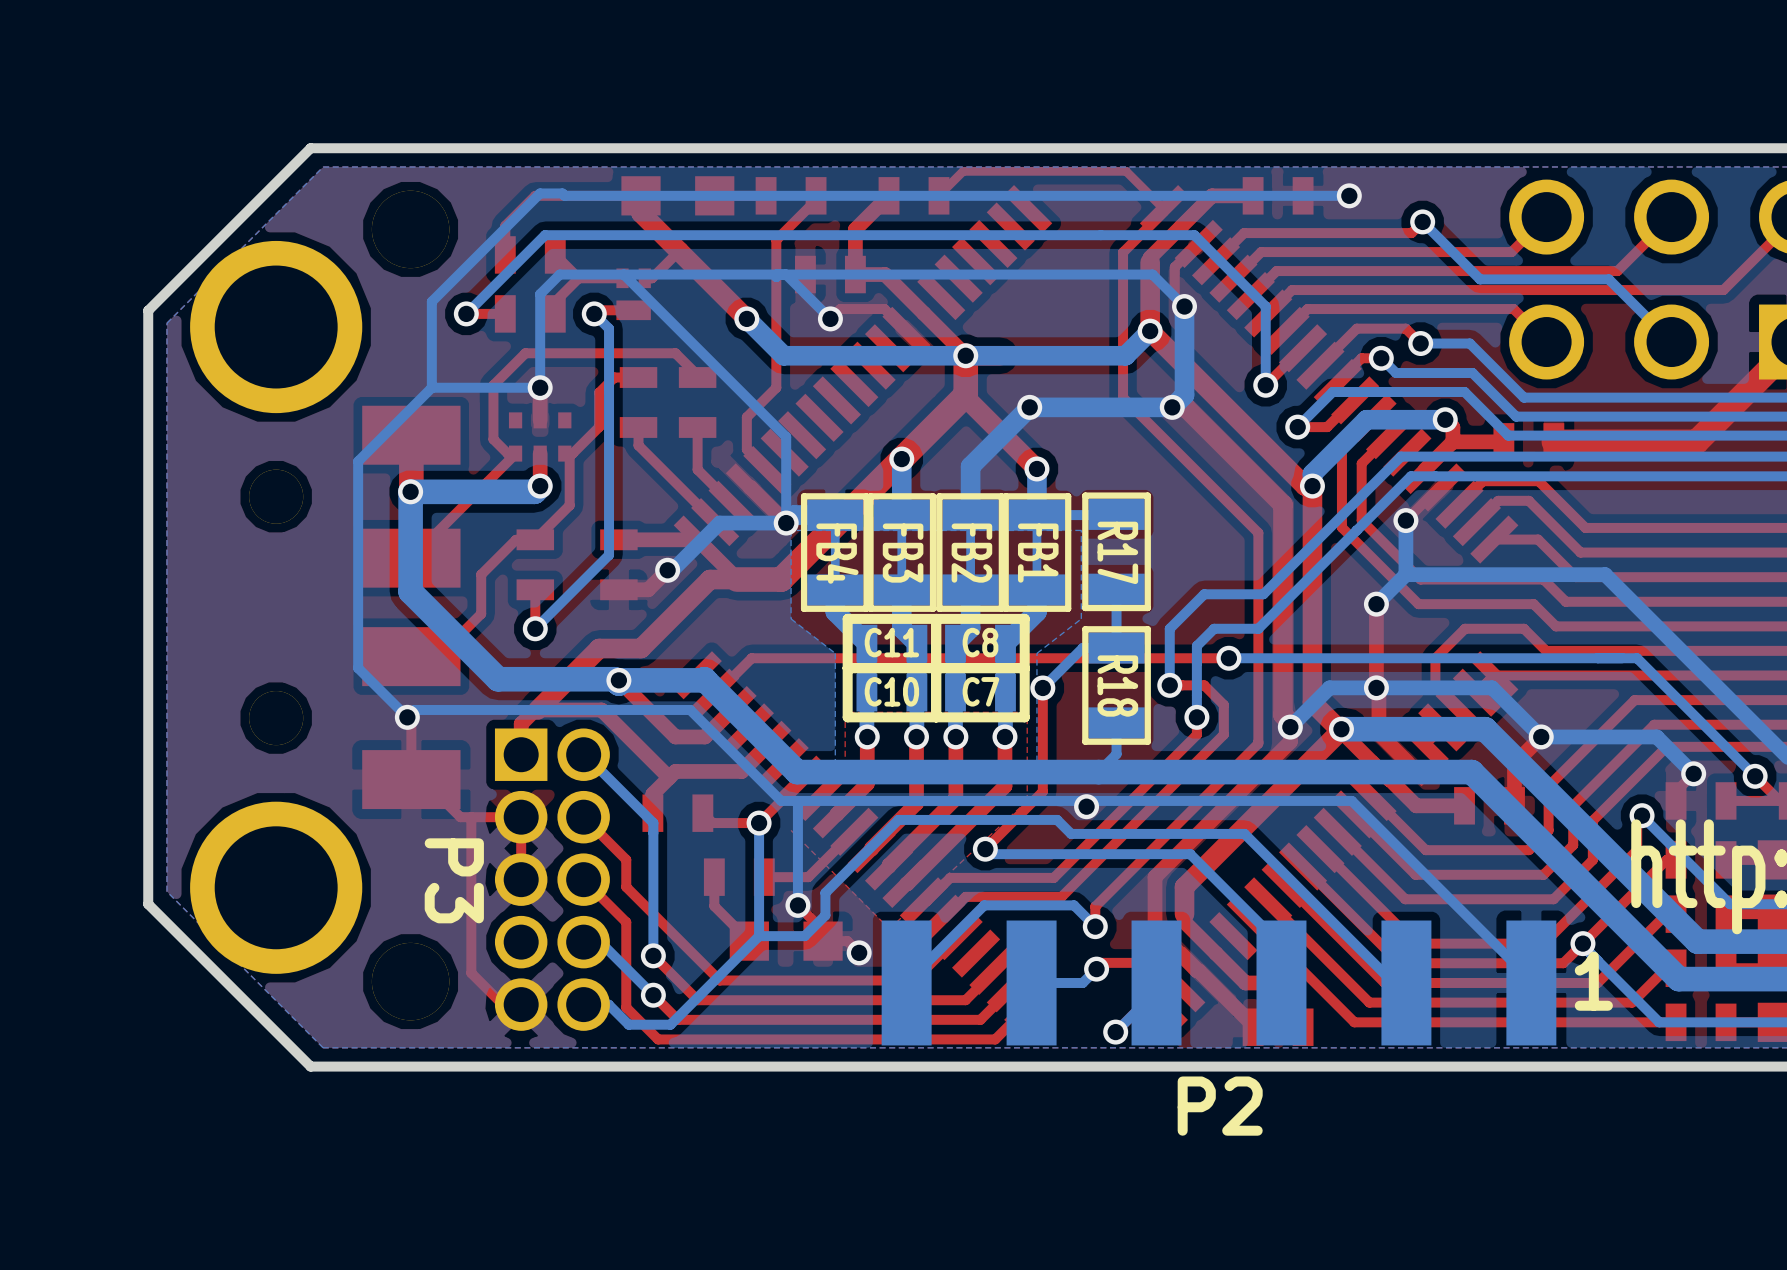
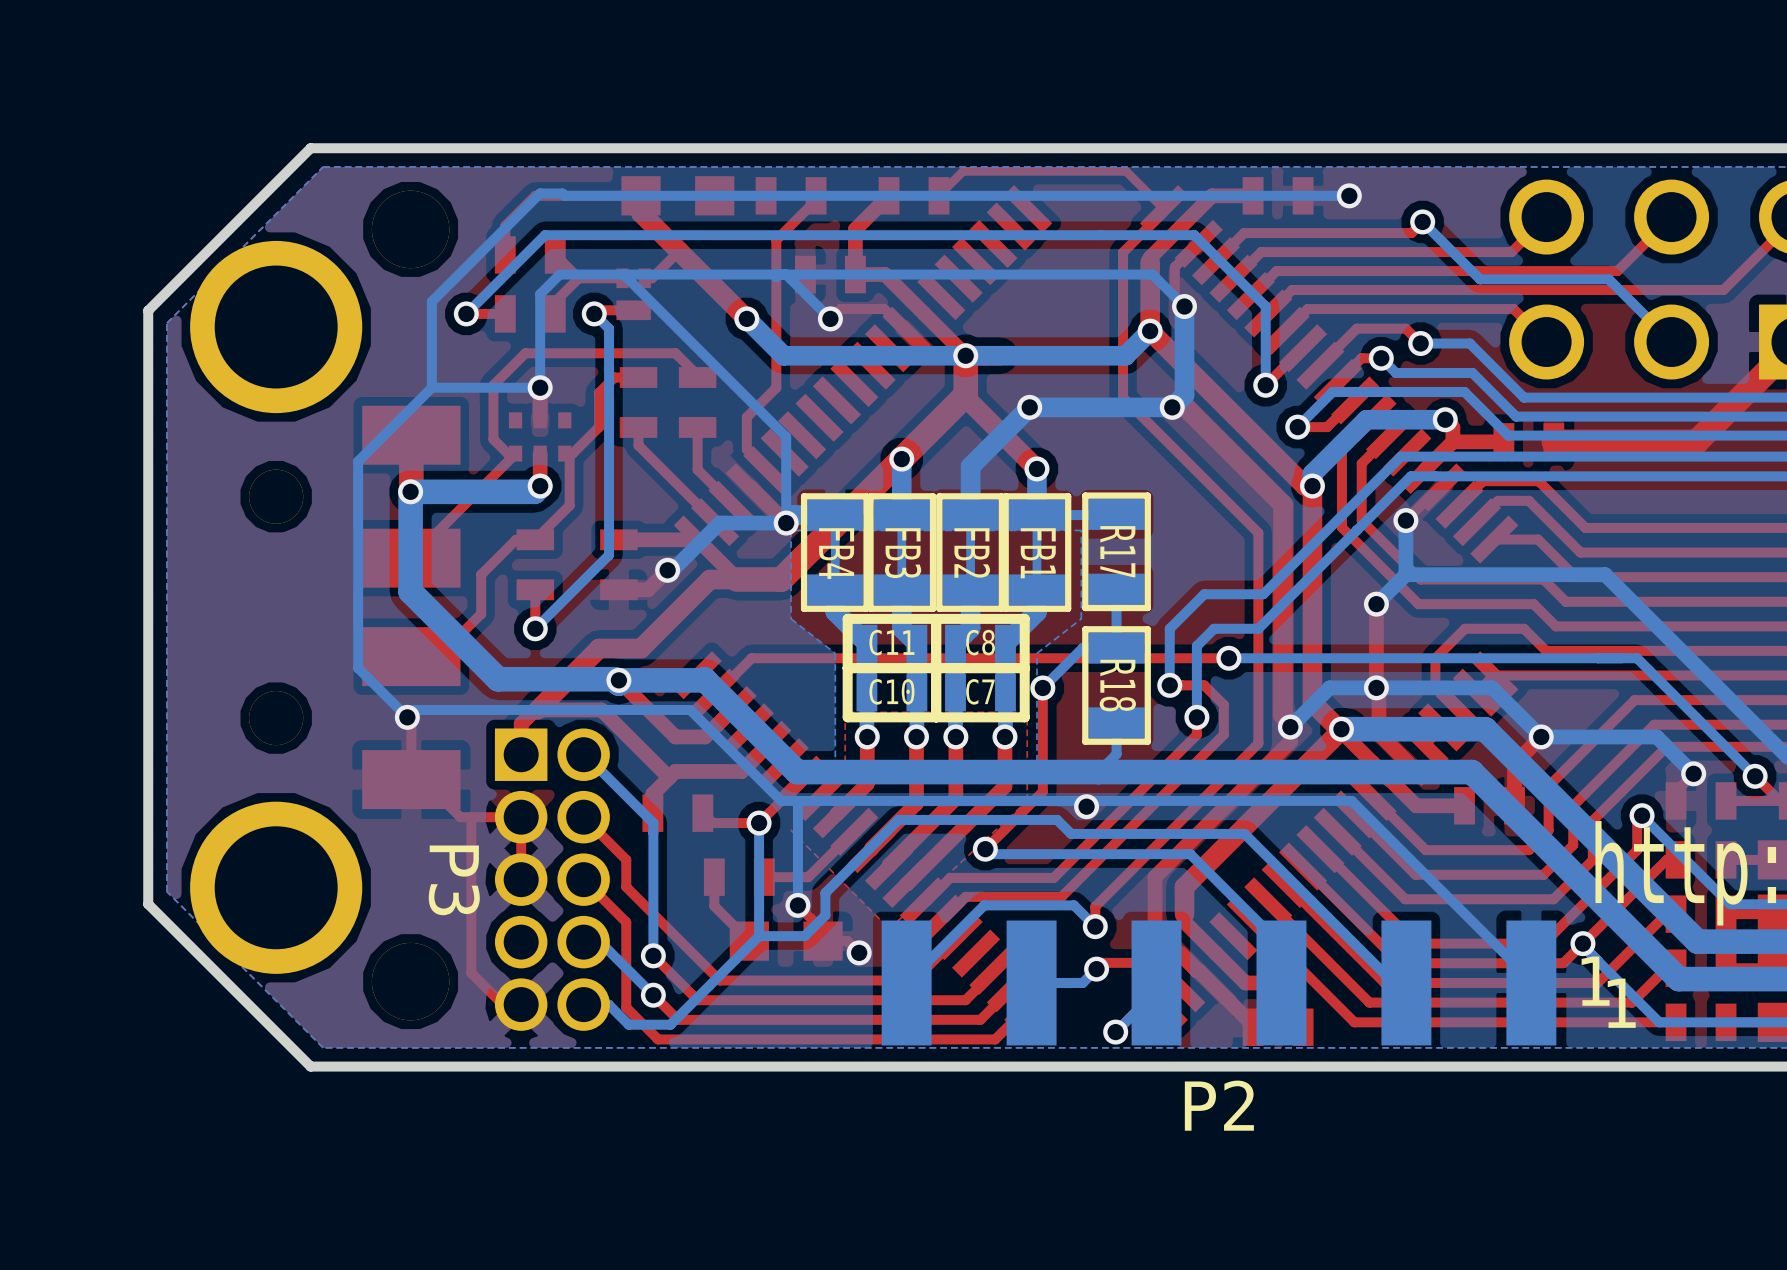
text: none -> 1 (1621, 1003)

